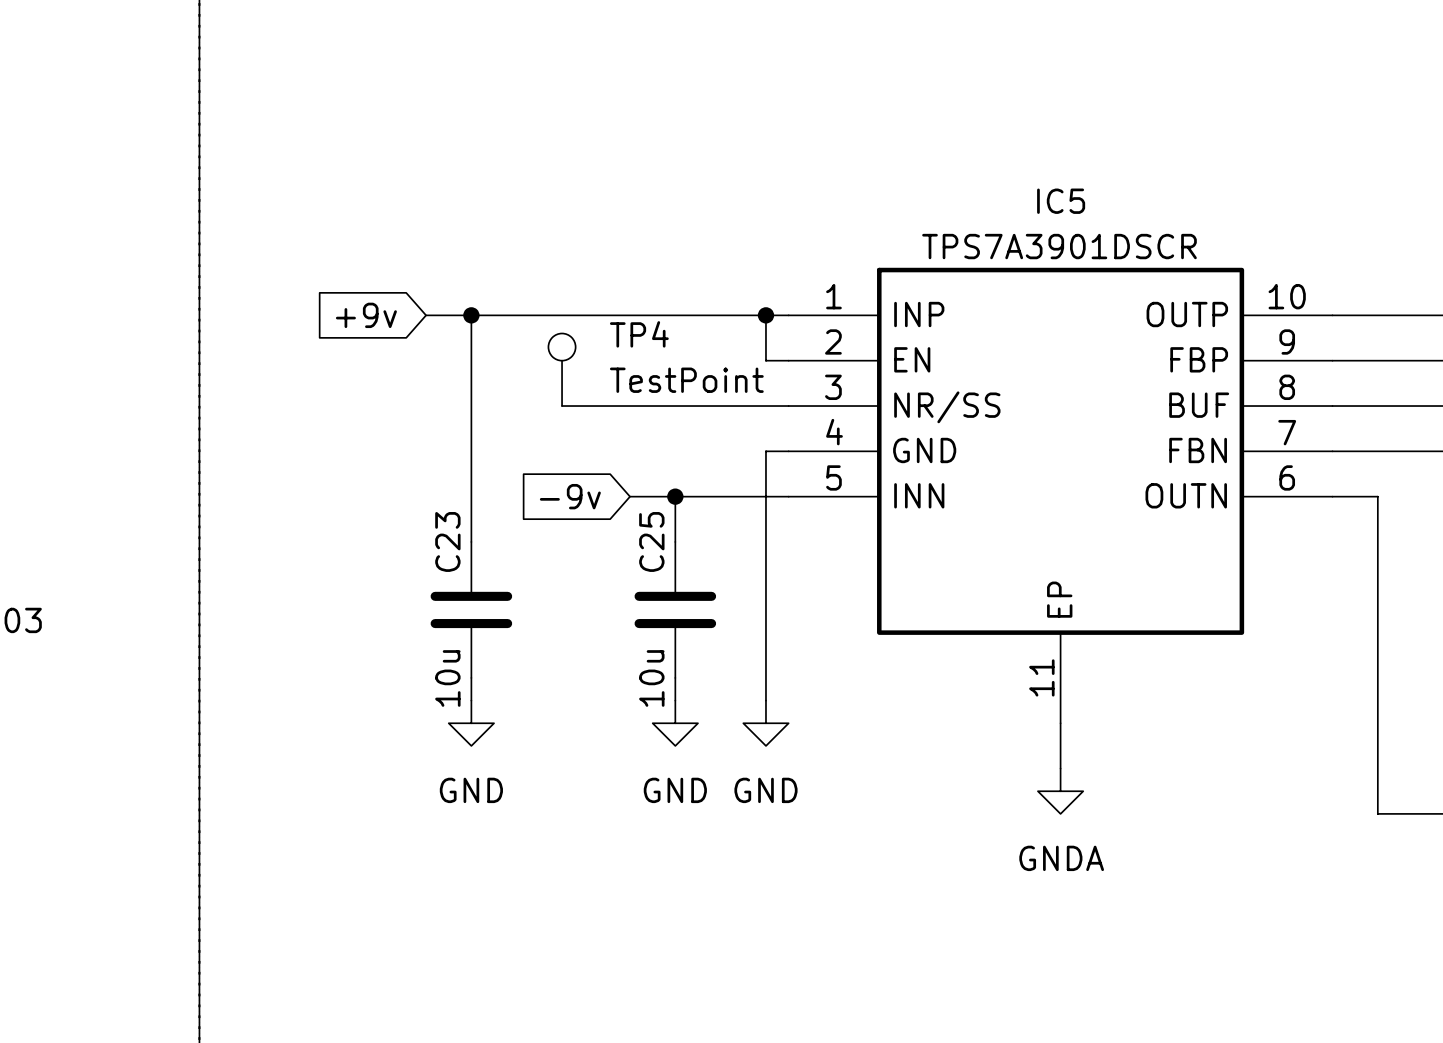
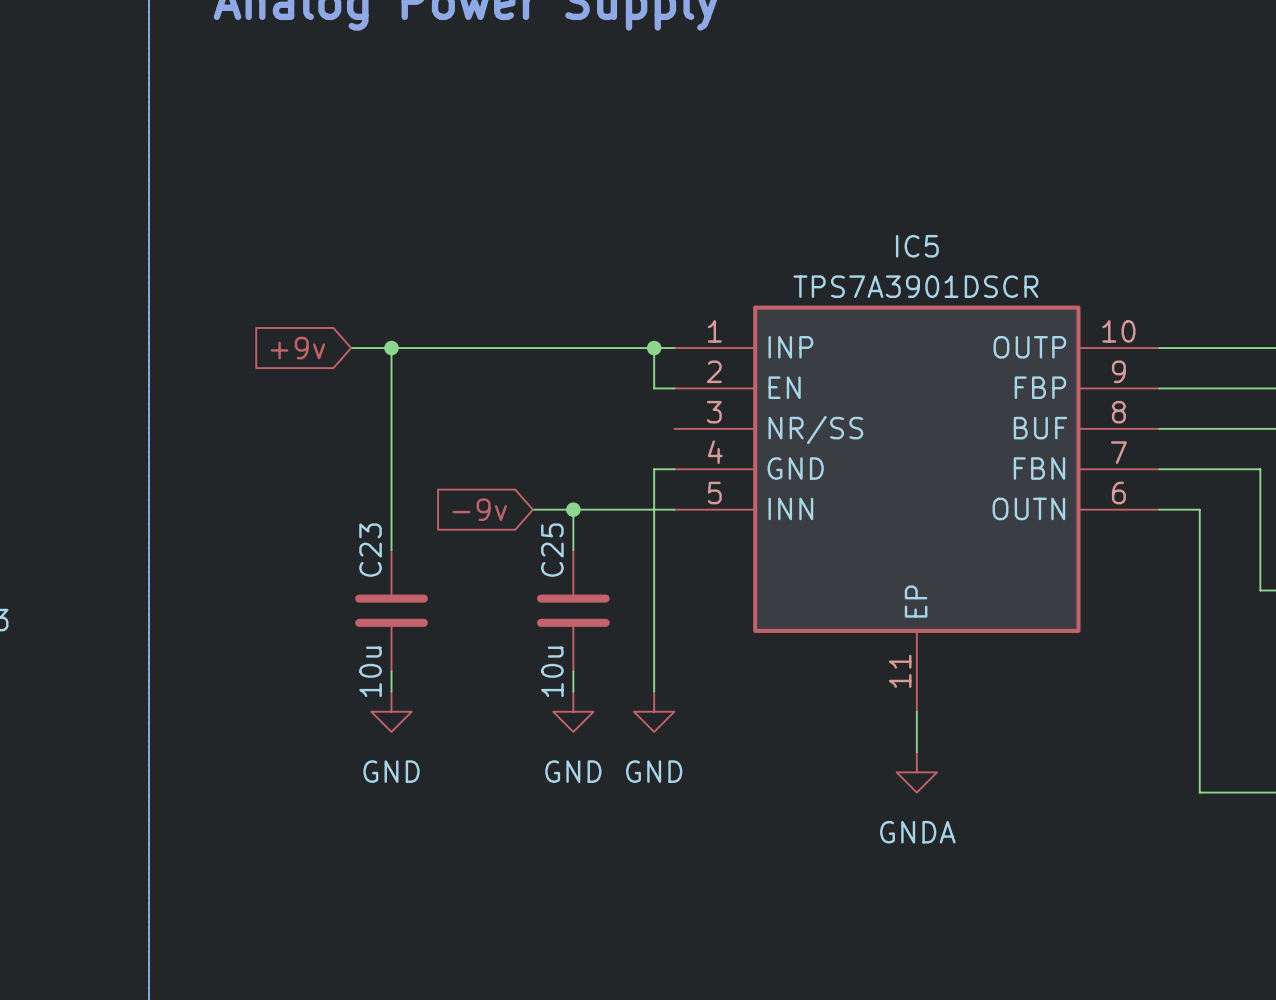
TP4: TestPoint (562, 369) -> none
wire: (562, 406) (788, 406) -> none

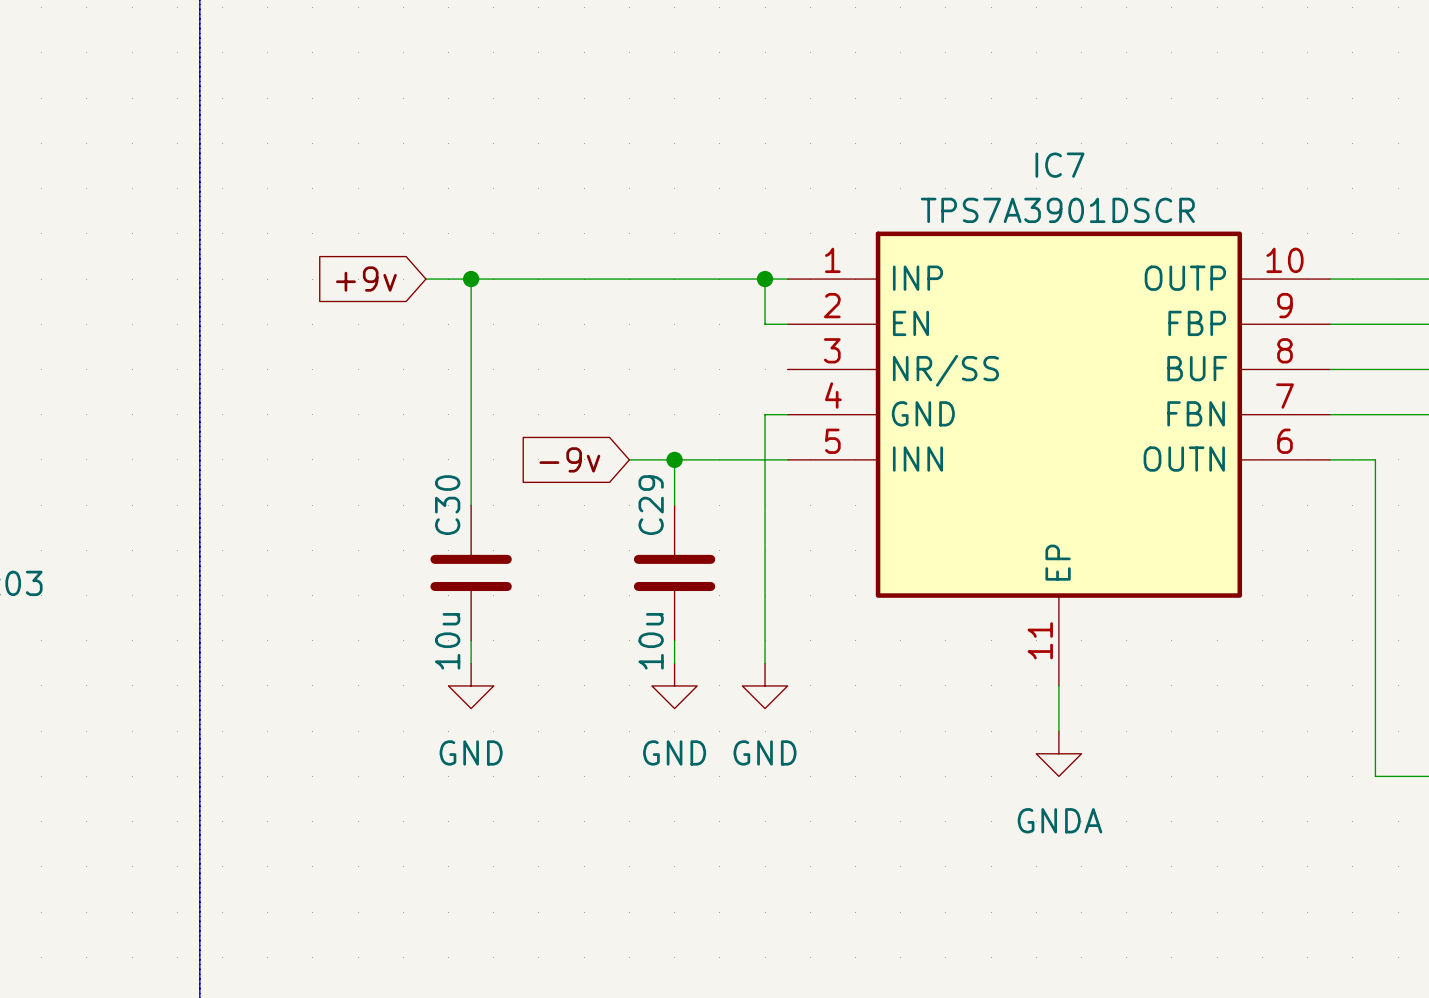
IC5 name: IC5 (917, 246) -> IC7 (1059, 165)
C23 name: C23 (370, 550) -> C30 (447, 505)
C25 name: C25 (552, 550) -> C29 (651, 505)

